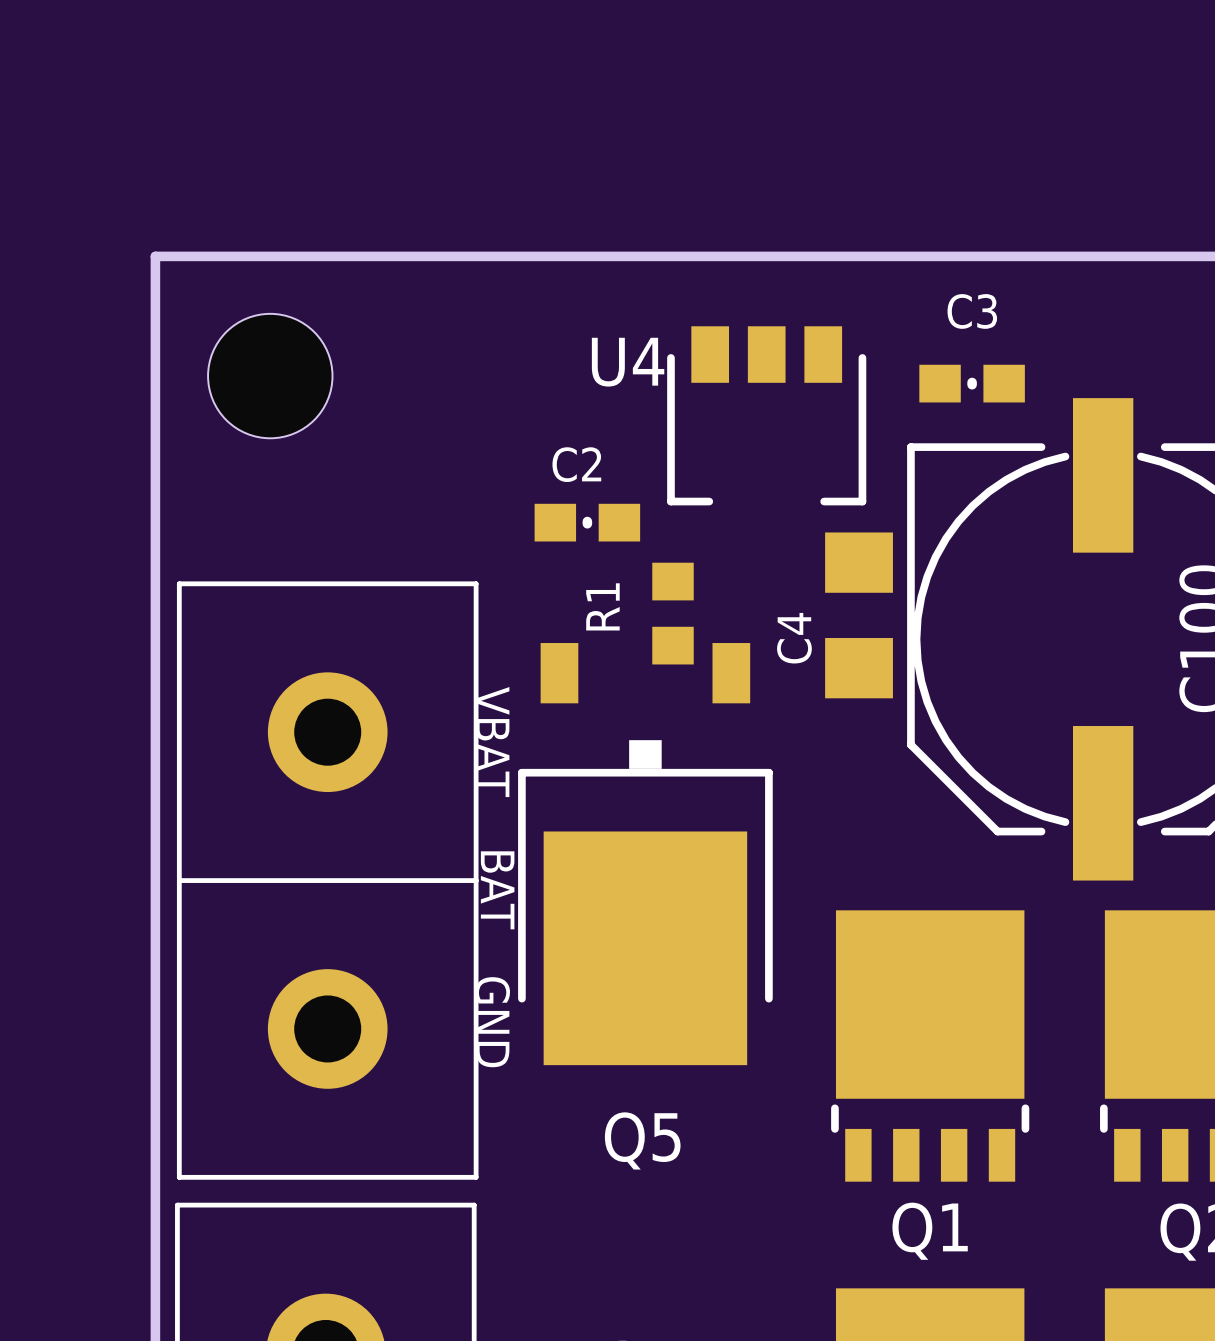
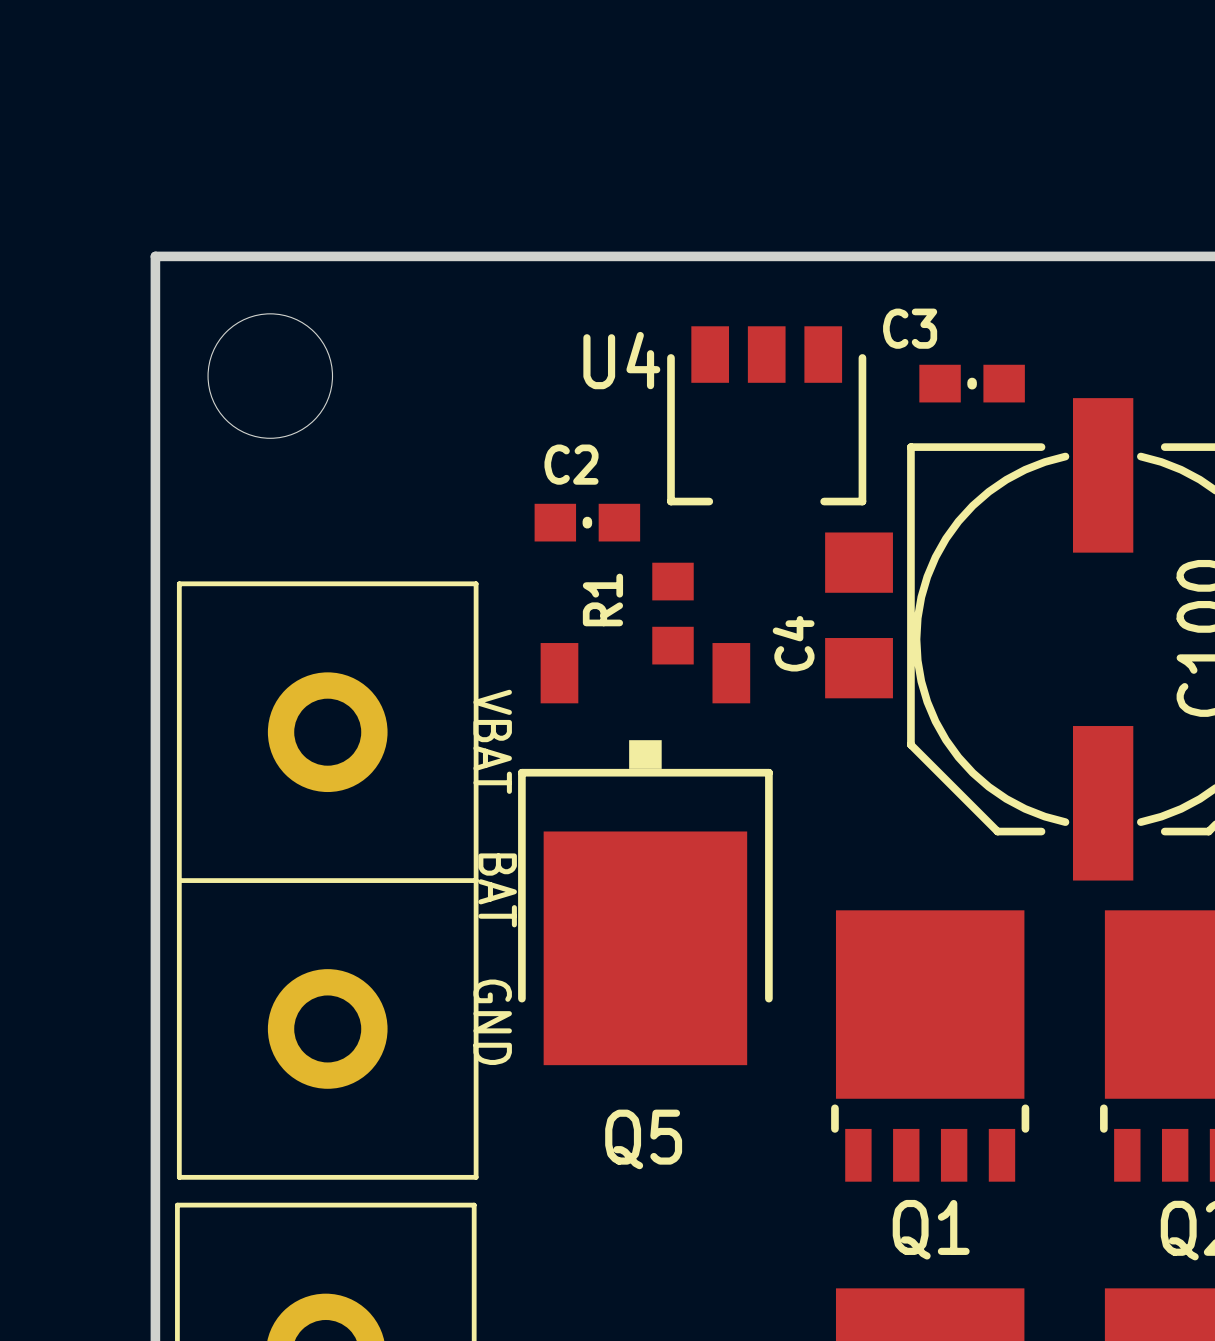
C3 name position: C3 (972, 311) -> C3 (910, 328)

